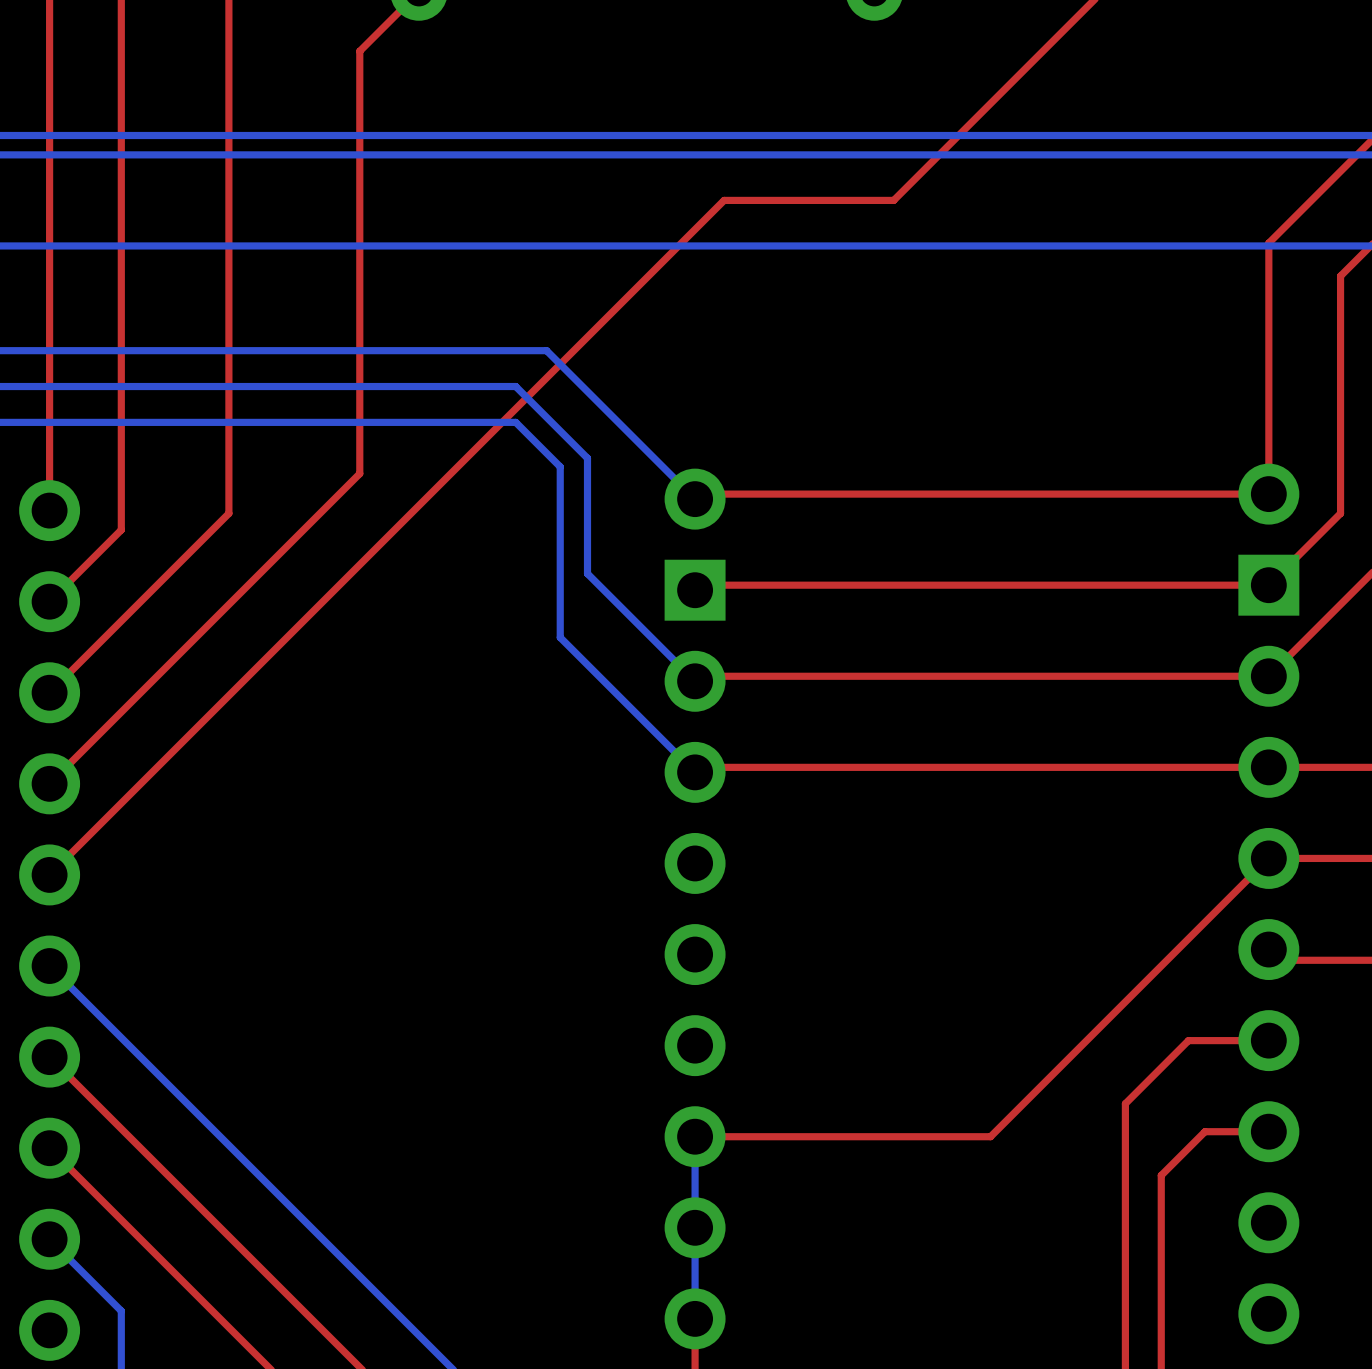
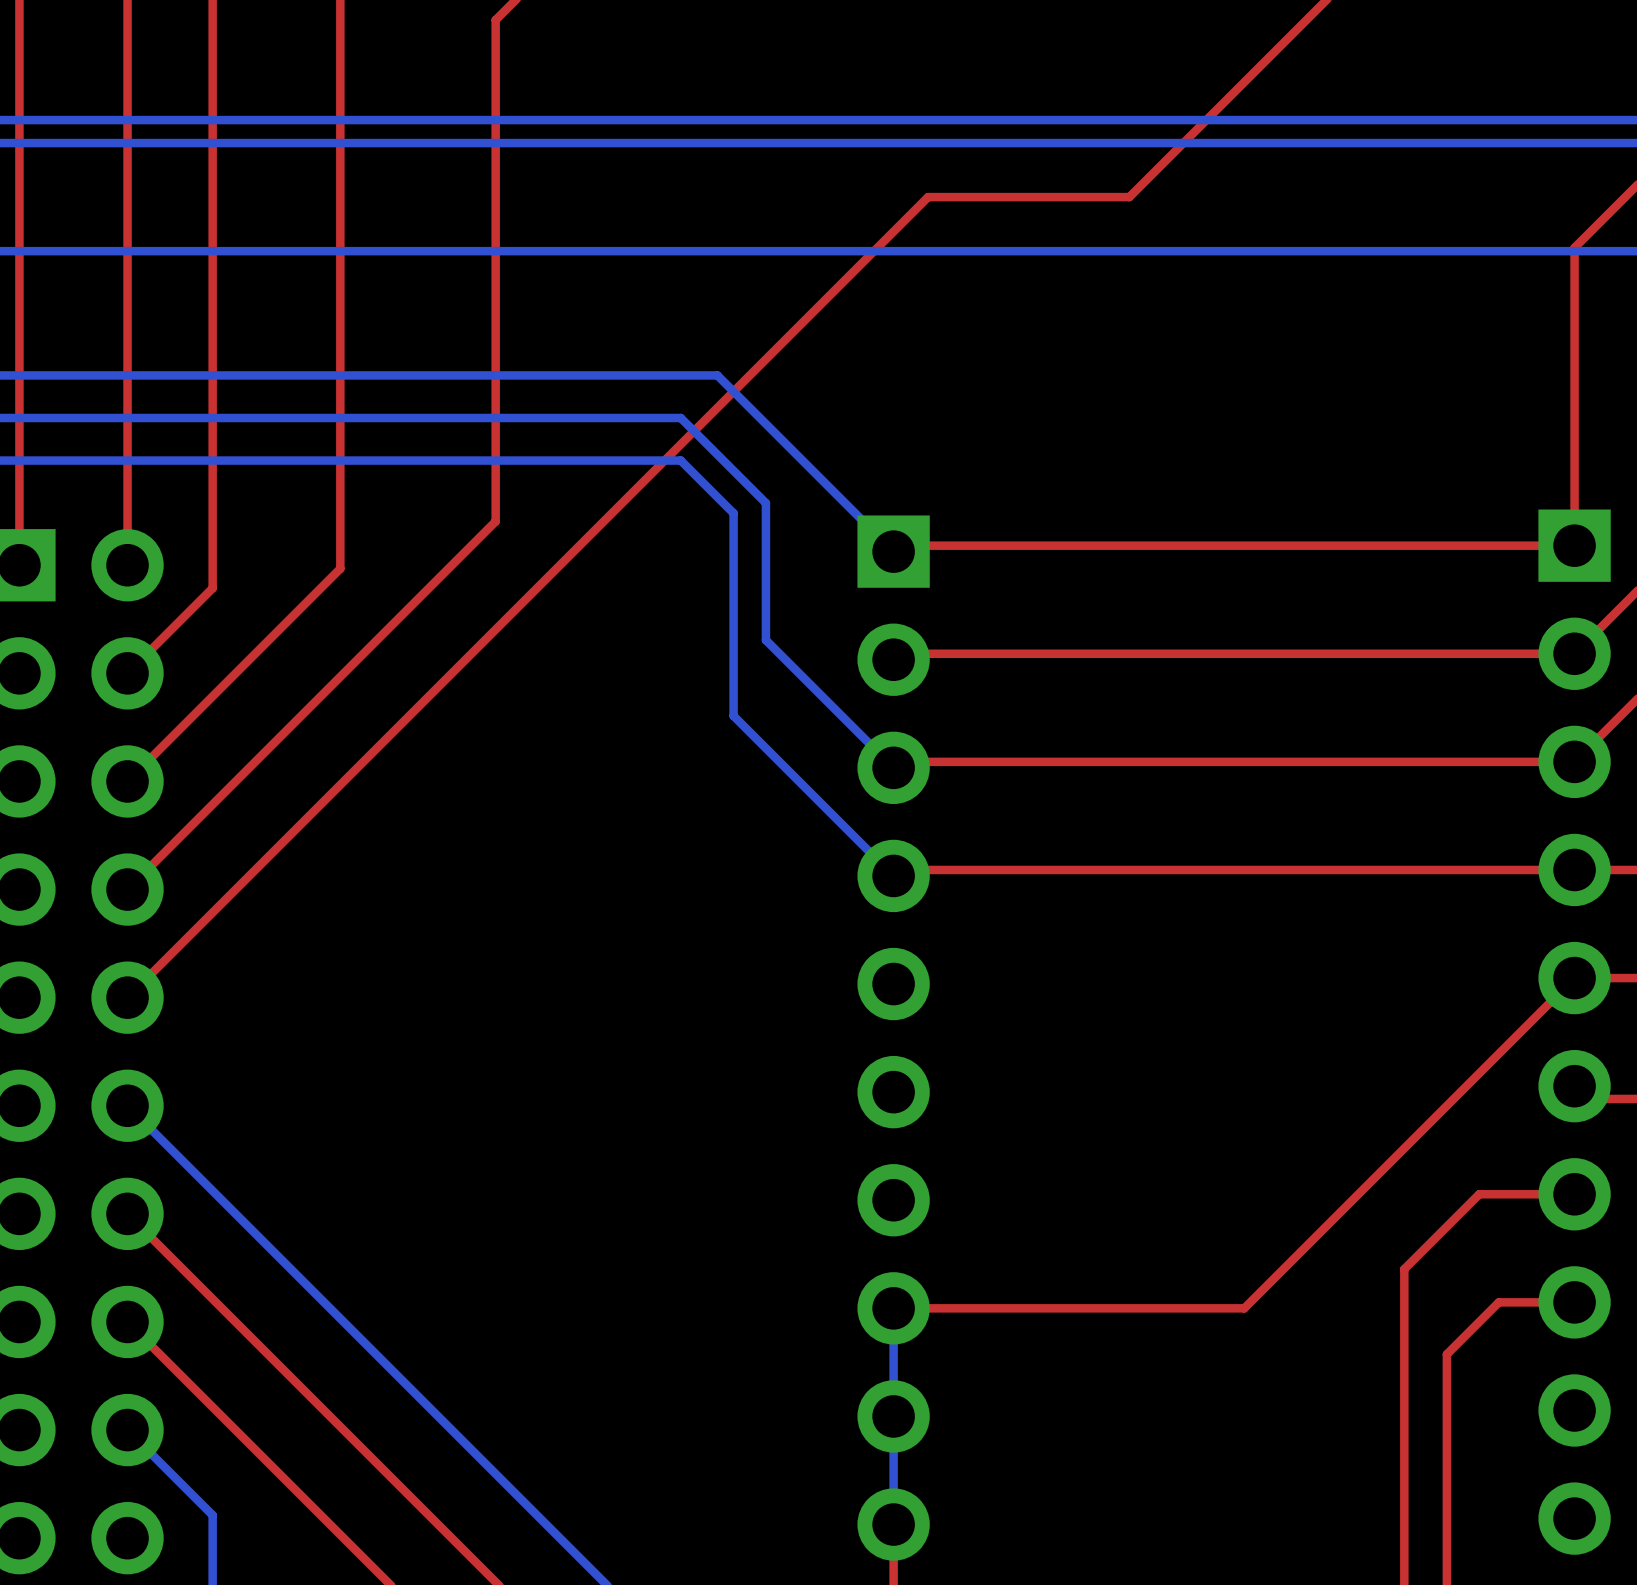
part footprint: [1238, 463, 1300, 1345] -> [1538, 509, 1611, 1555]
part footprint: [664, 468, 726, 1350] -> [857, 515, 930, 1561]

